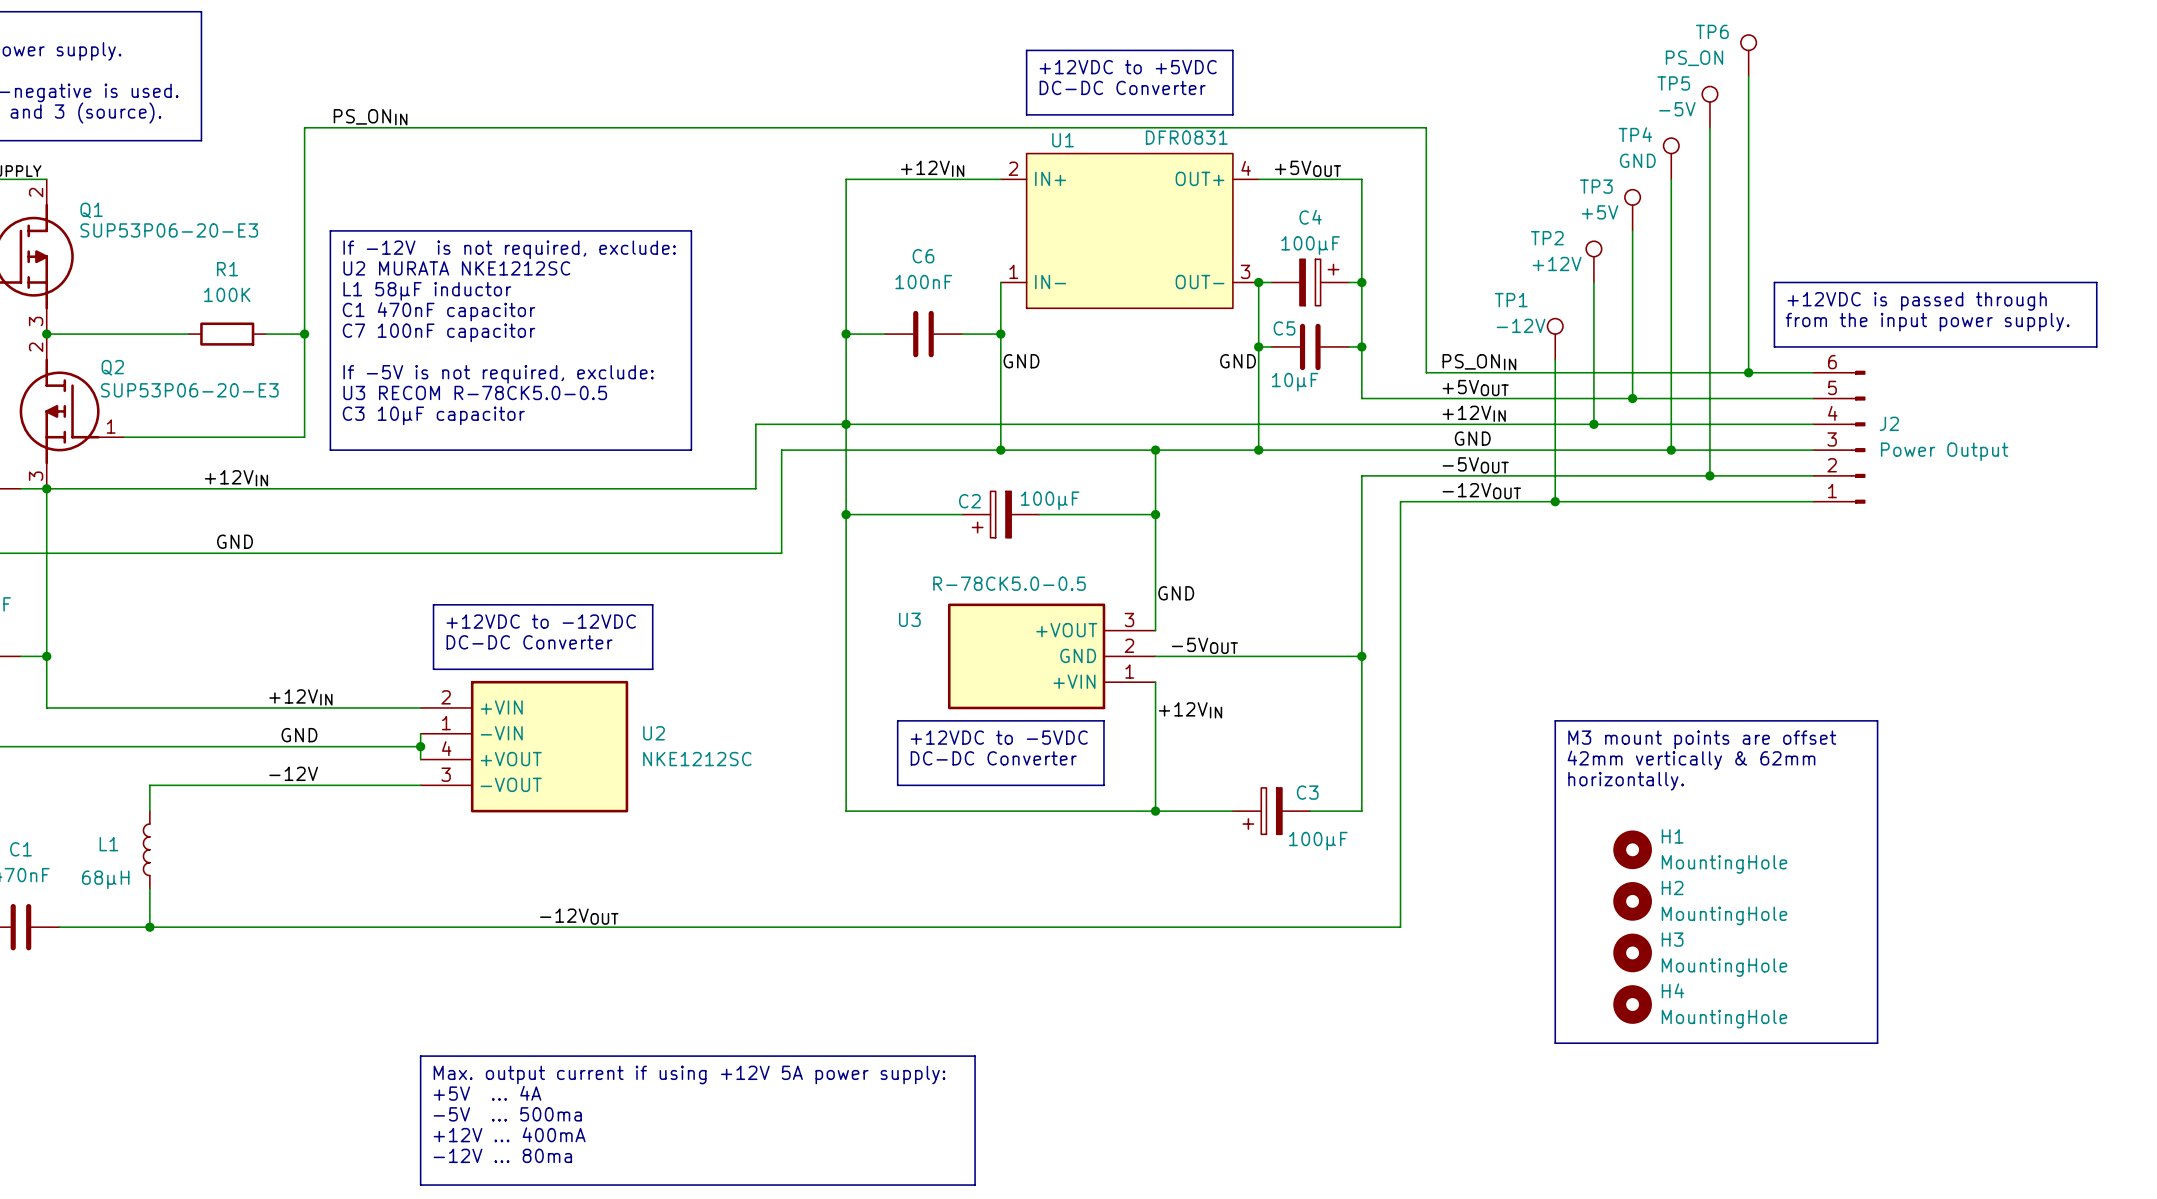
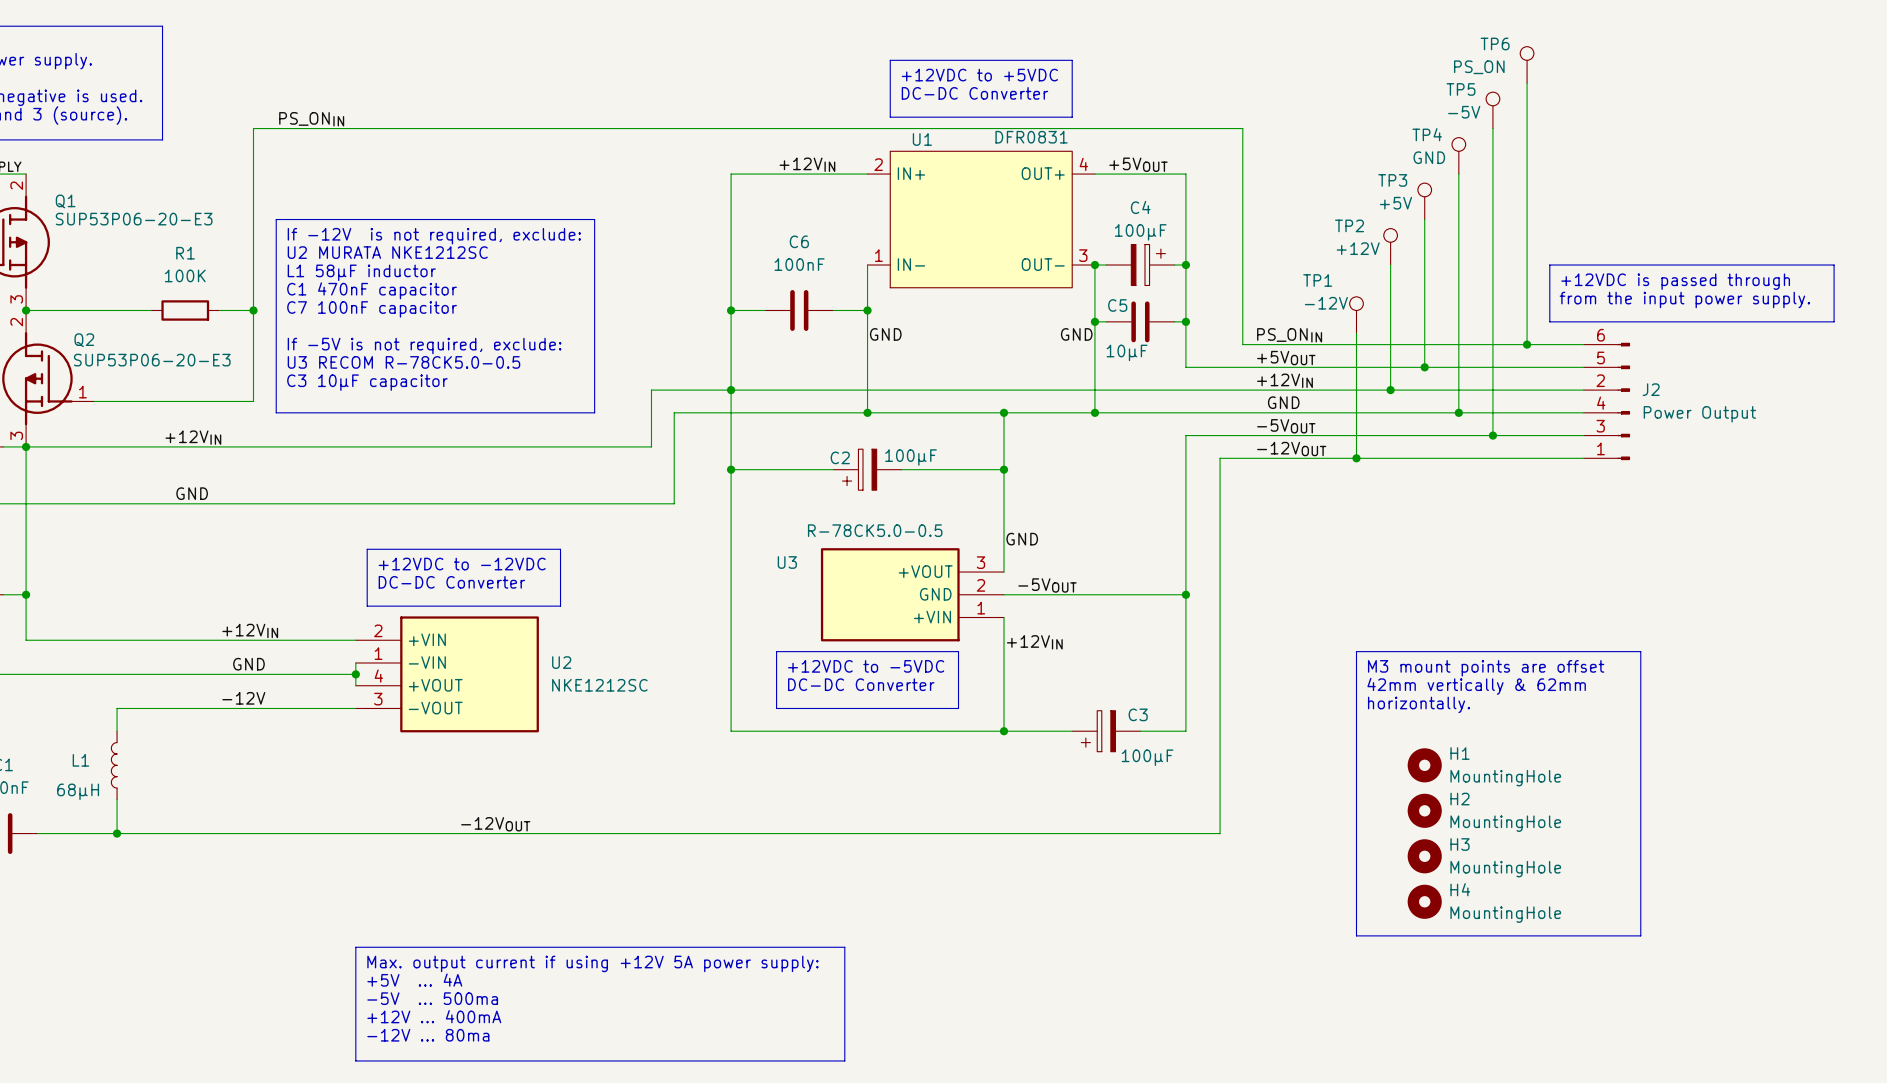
J2 pin number: 4 (1832, 413) -> 2 (1600, 380)
J2 pin number: 3 (1832, 439) -> 4 (1601, 403)
J2 pin number: 2 (1832, 465) -> 3 (1600, 426)

